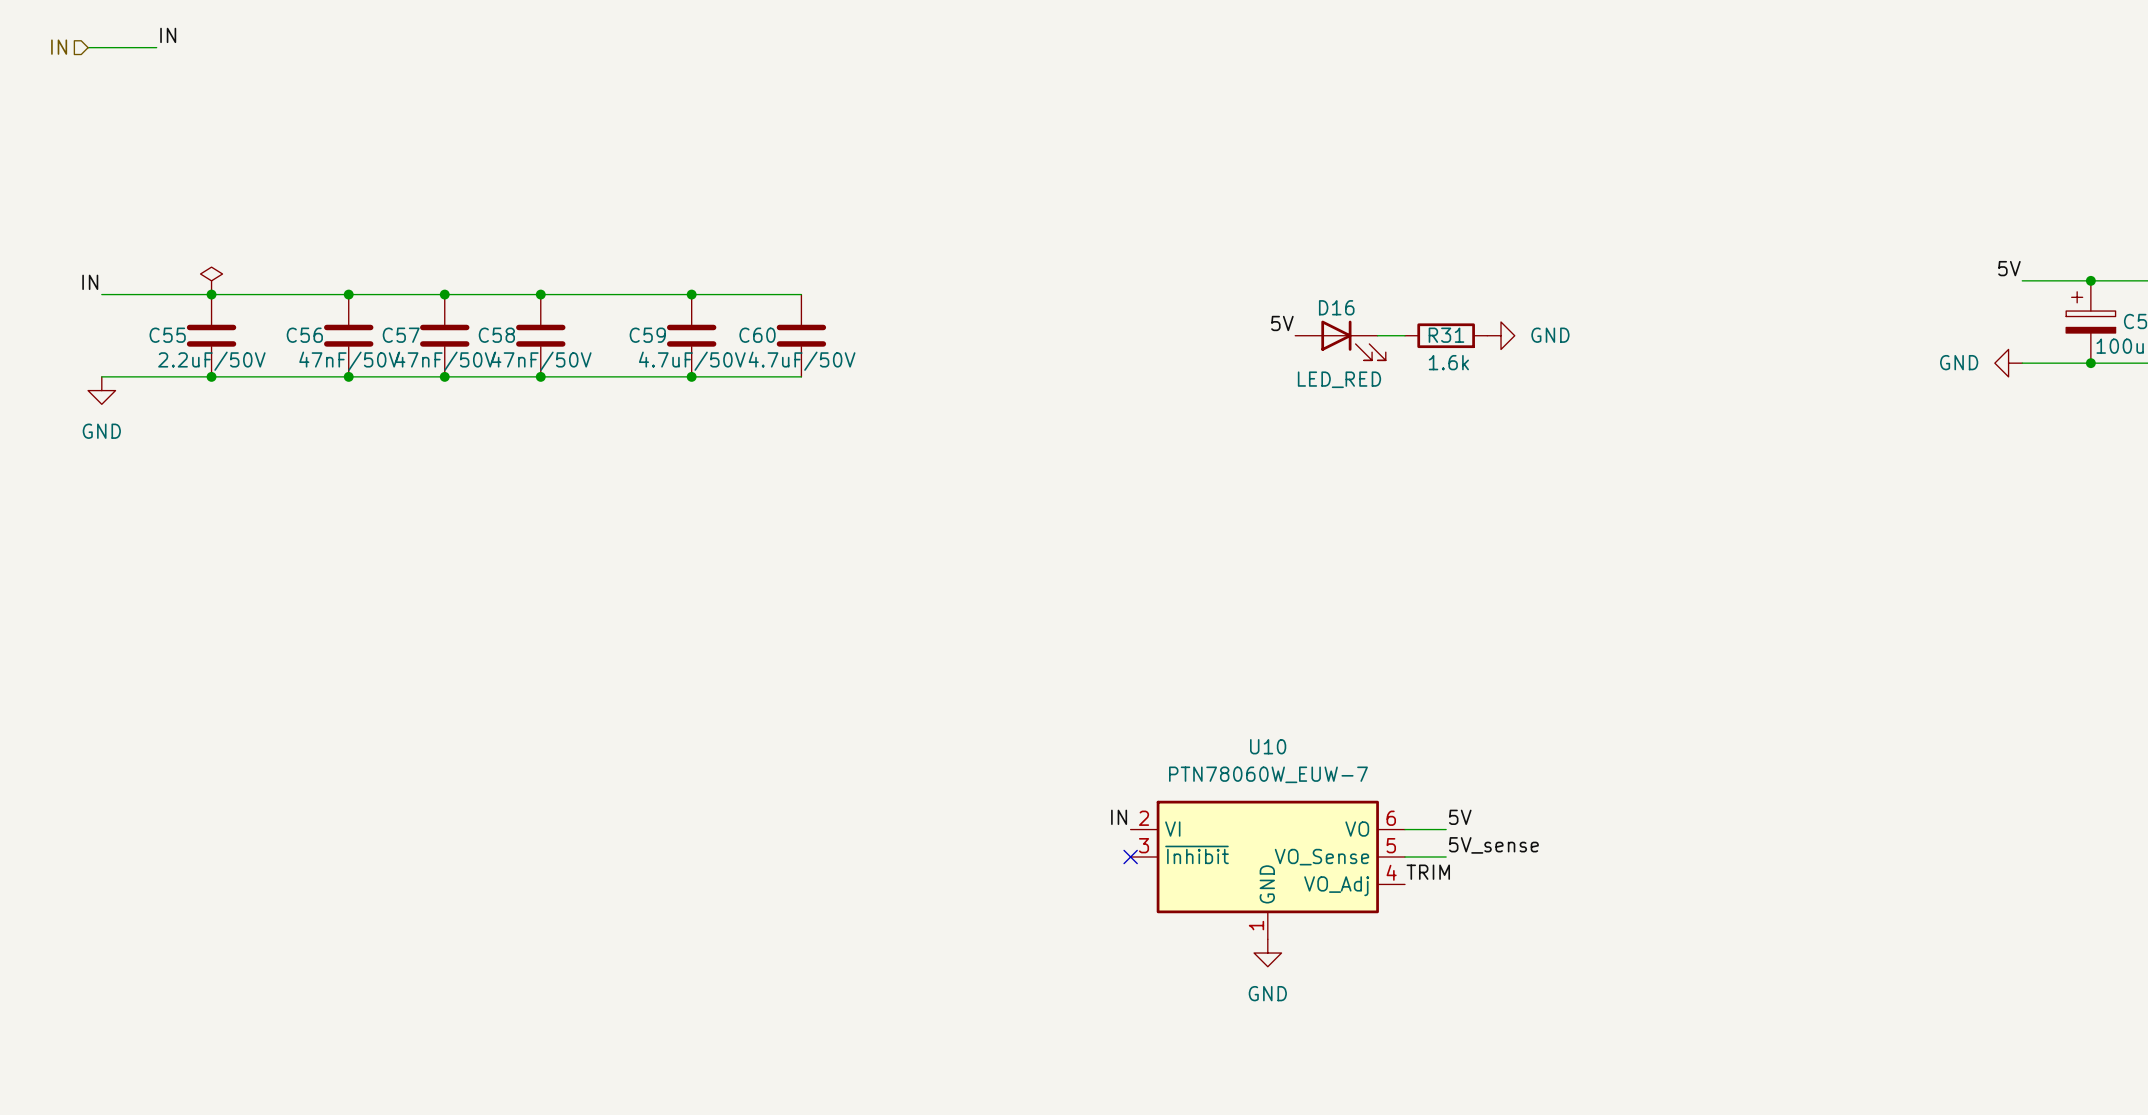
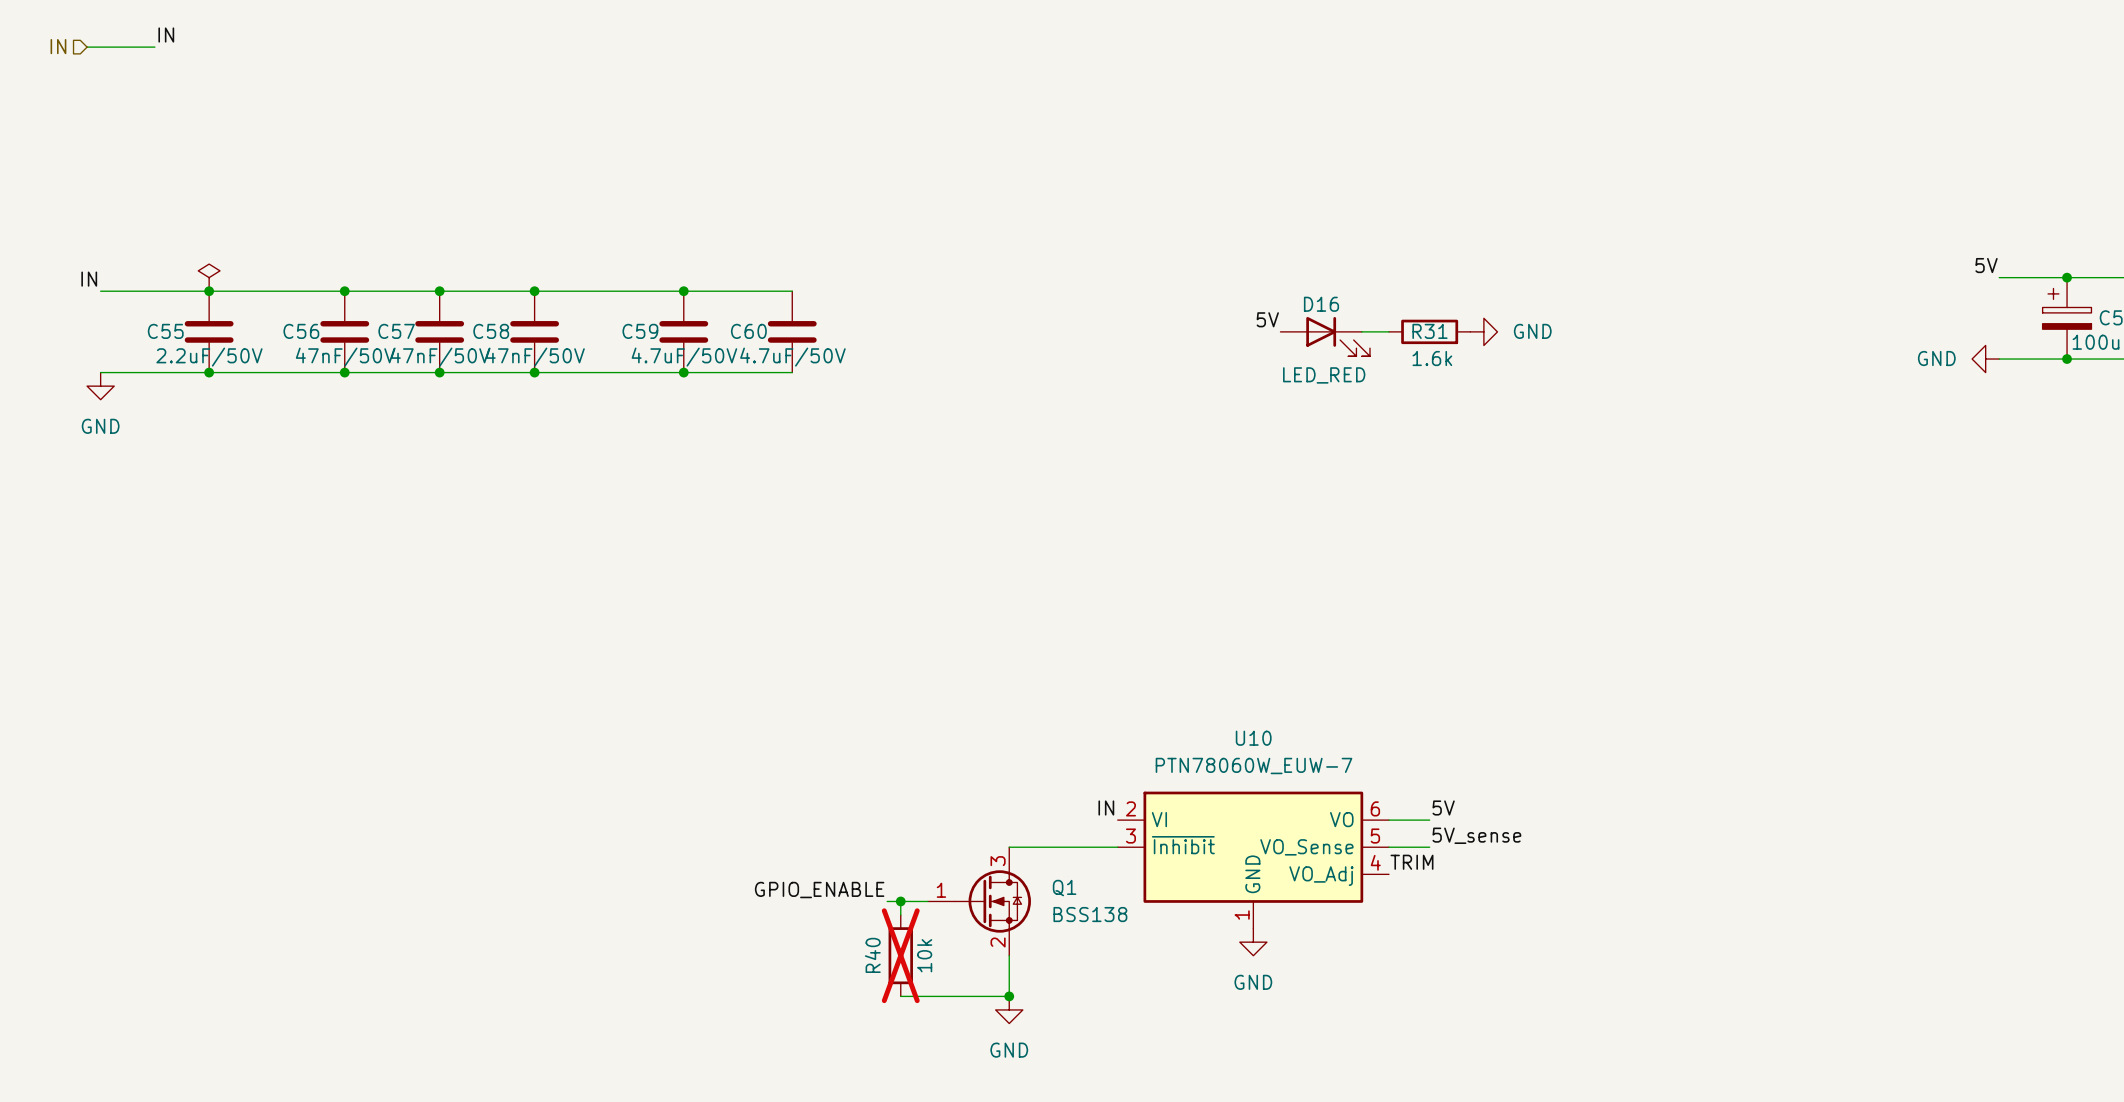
wire: none -> (1009, 847) (1117, 847)
no-connect mark: (1130, 856) -> none
label: none -> GPIO_ENABLE (819, 890)
wire: none -> (887, 901) (927, 901)
wire: none -> (900, 901) (900, 915)
junction: none -> (900, 901)
Q1: none -> BSS138 (979, 901)
R40: none -> 10k (900, 955)
wire: none -> (1009, 955) (1009, 996) (900, 996)
junction: none -> (1009, 996)
power symbol: none -> GND (1009, 1009)

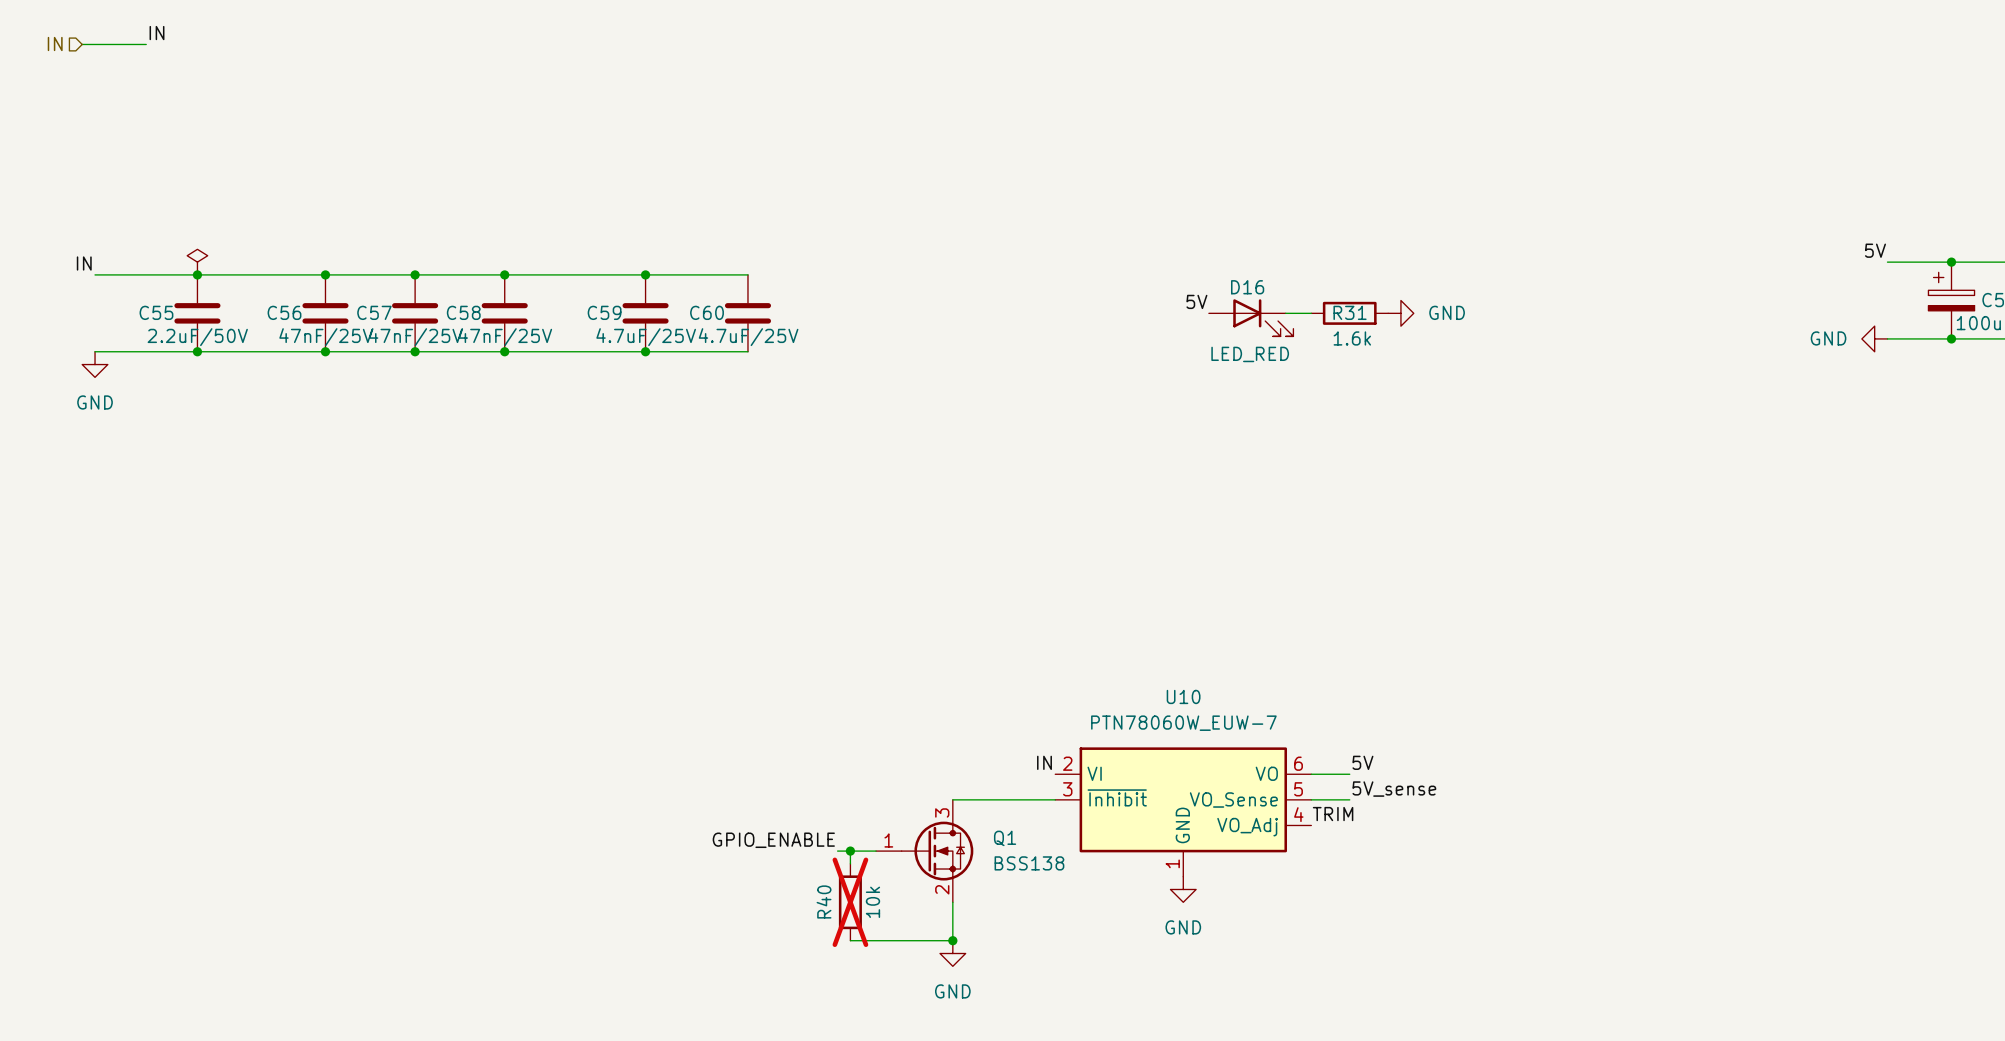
C56 value: 47nF/50V (345, 357) -> 47nF/25V (326, 337)
C57 value: 47nF/50V (440, 357) -> 47nF/25V (415, 337)
C58 value: 47nF/50V (535, 357) -> 47nF/25V (505, 337)
C59 value: 4.7uF/50V (684, 357) -> 4.7uF/25V (646, 337)
C60 value: 4.7uF/50V (792, 357) -> 4.7uF/25V (748, 337)

